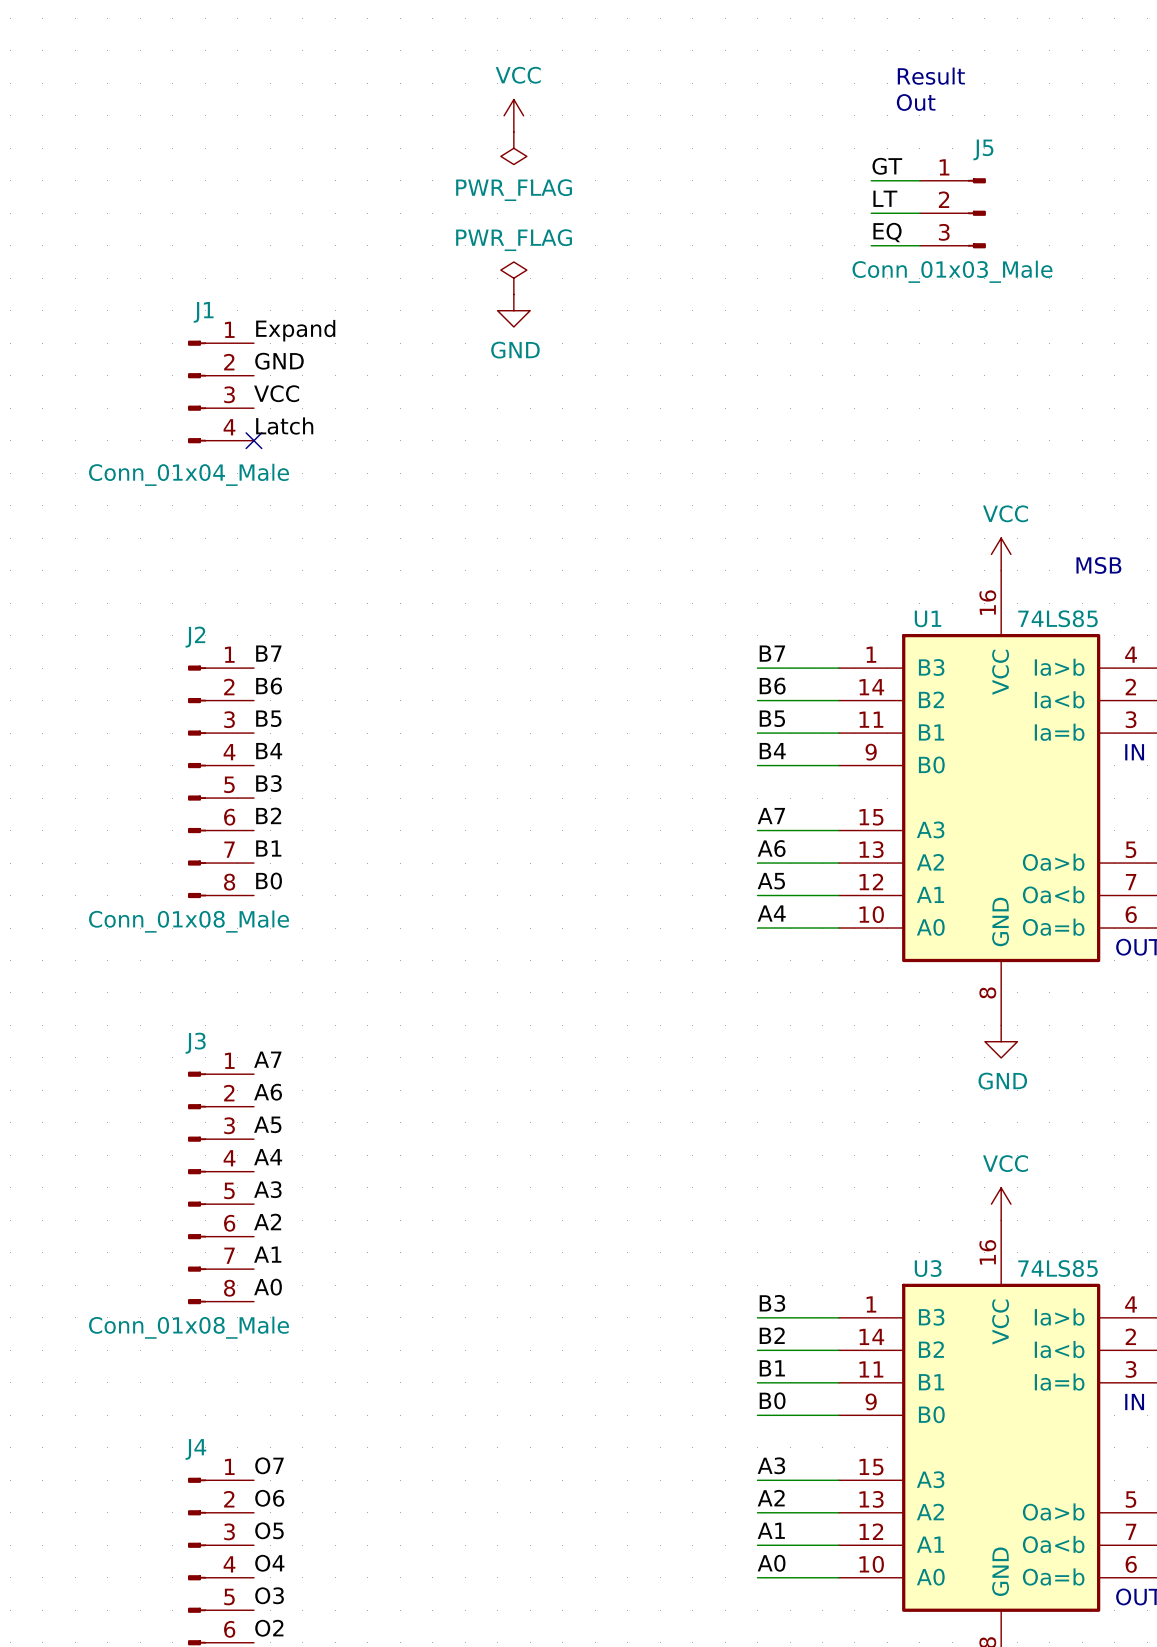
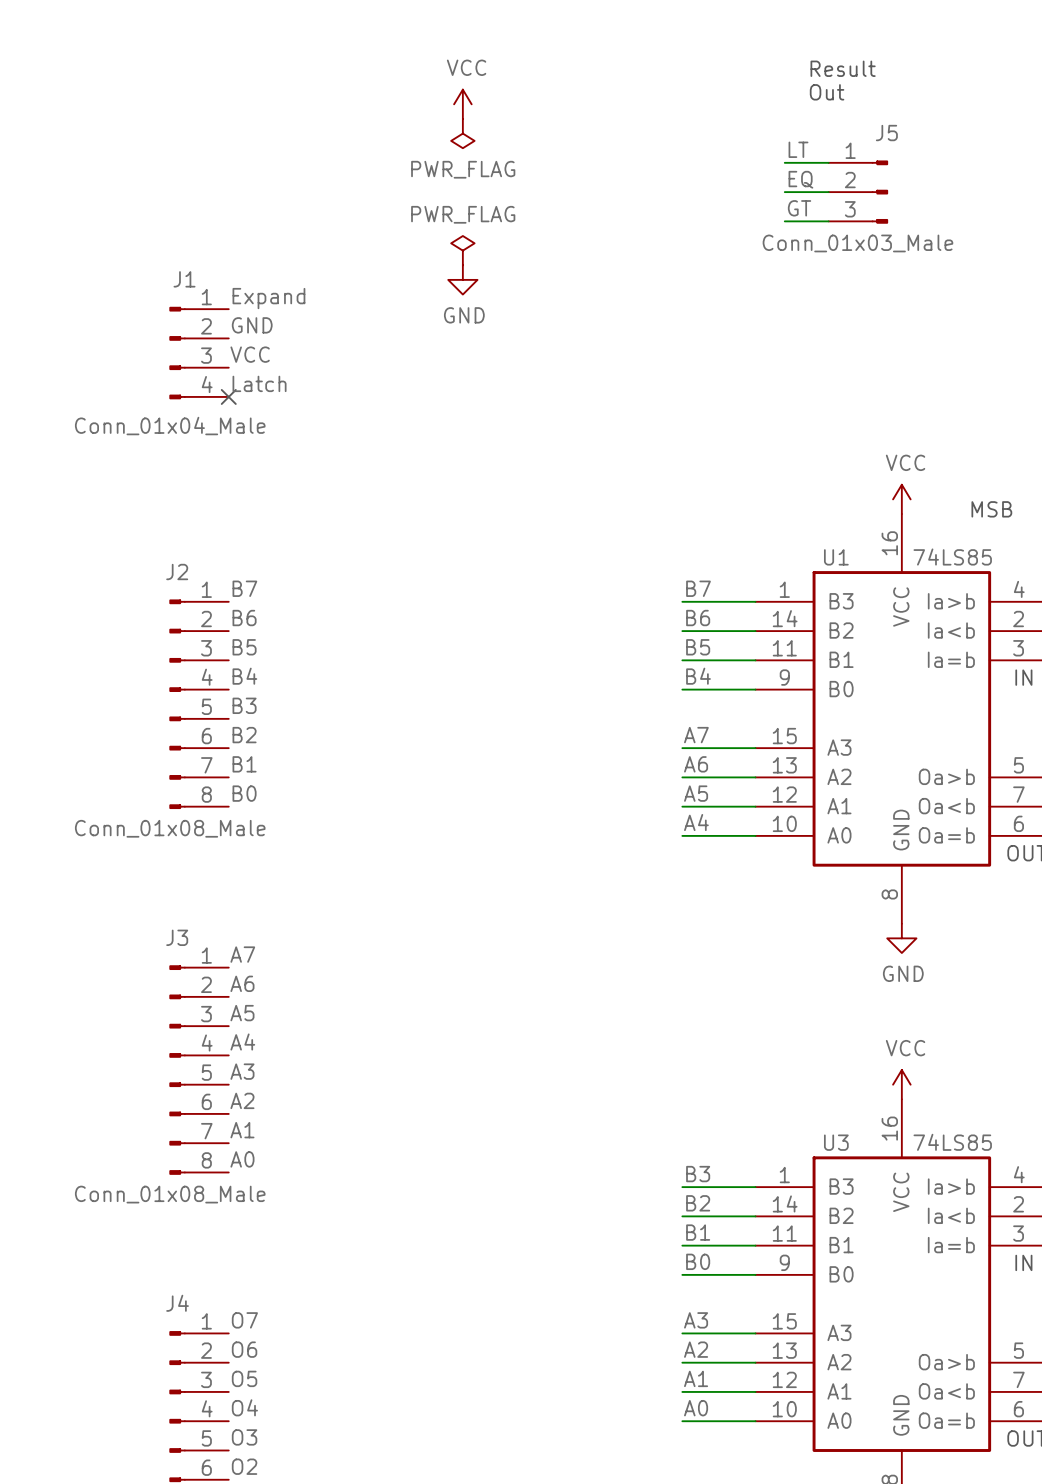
label: GT (887, 166) -> LT (798, 149)
label: LT (885, 198) -> EQ (800, 179)
label: EQ (887, 232) -> GT (799, 208)

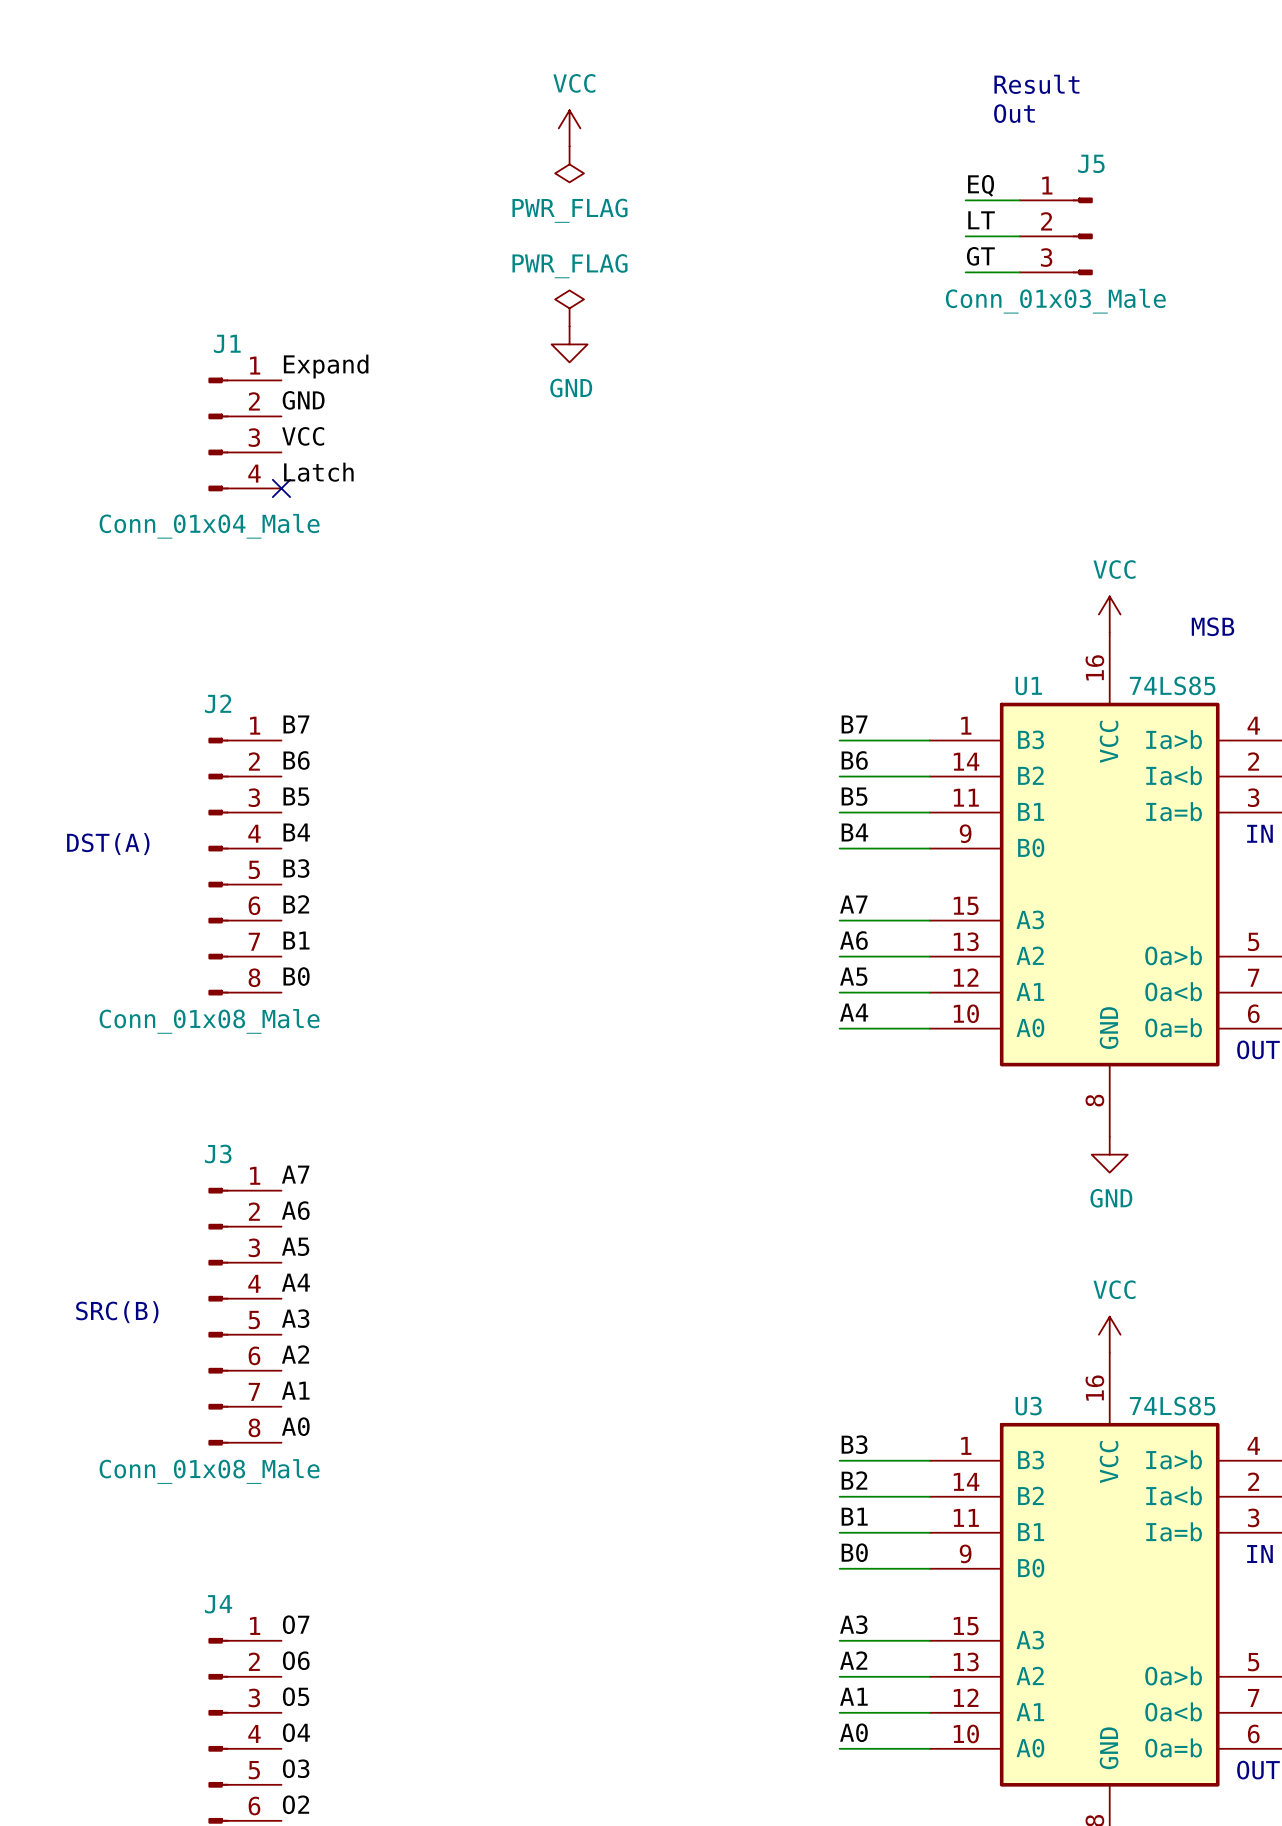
label: LT (798, 149) -> EQ (981, 185)
label: EQ (800, 179) -> LT (981, 220)
text: none -> DST(A) (108, 844)
text: none -> SRC(B) (117, 1312)

